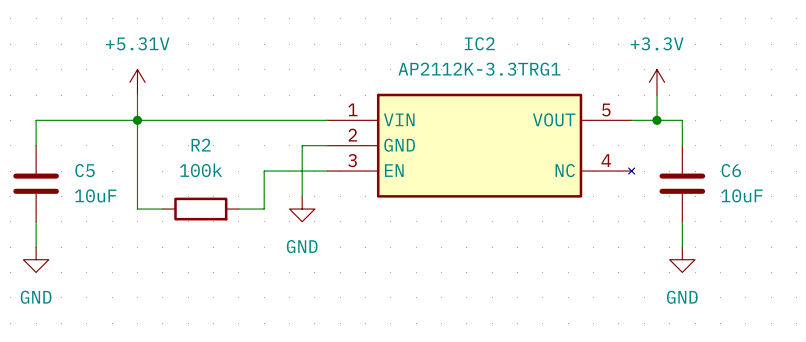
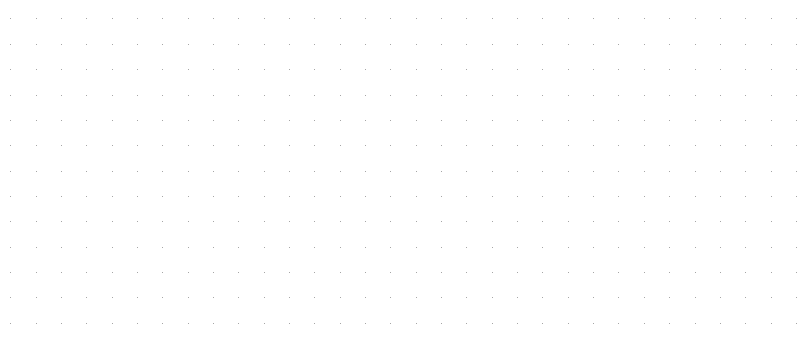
power symbol: +5.31V (137, 82) -> none
power symbol: +3.3V (656, 82) -> none
wire: (137, 95) (137, 209) (162, 209) -> none
wire: (656, 95) (656, 120) -> none
junction: (137, 120) -> none
wire: (327, 120) (36, 120) (36, 145) -> none
wire: (631, 120) (682, 120) (682, 145) -> none
junction: (656, 120) -> none
wire: (327, 145) (302, 145) (302, 196) -> none
IC2: AP2112K-3.3TRG1 (481, 145) -> none
wire: (327, 171) (264, 171) (264, 209) (238, 209) -> none
C5: 10uF (36, 183) -> none
C6: 10uF (682, 183) -> none
R2: 100k (200, 209) -> none
power symbol: GND (302, 209) -> none
wire: (36, 221) (36, 247) -> none
wire: (682, 221) (682, 247) -> none
power symbol: GND (36, 259) -> none
power symbol: GND (682, 259) -> none

